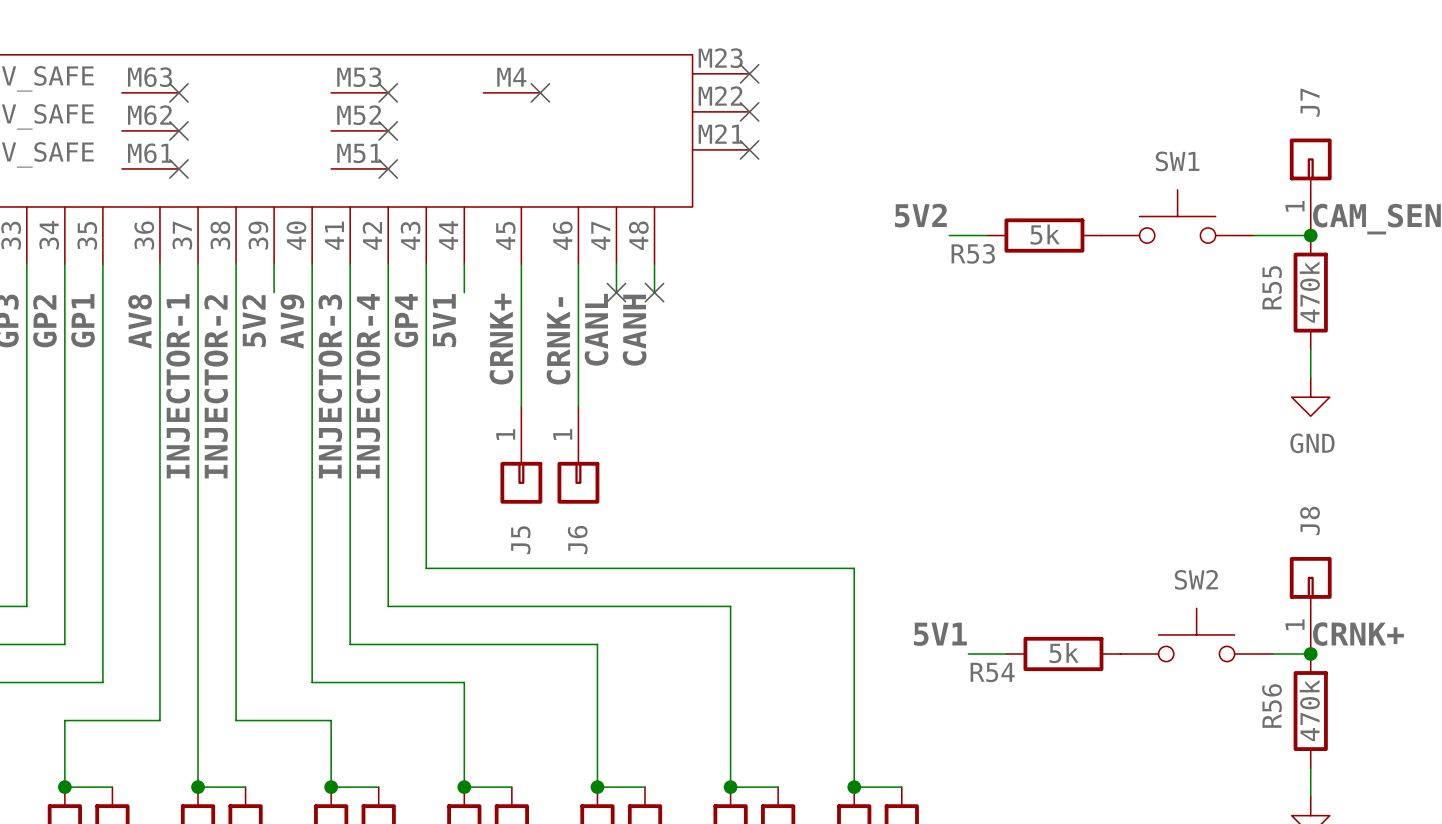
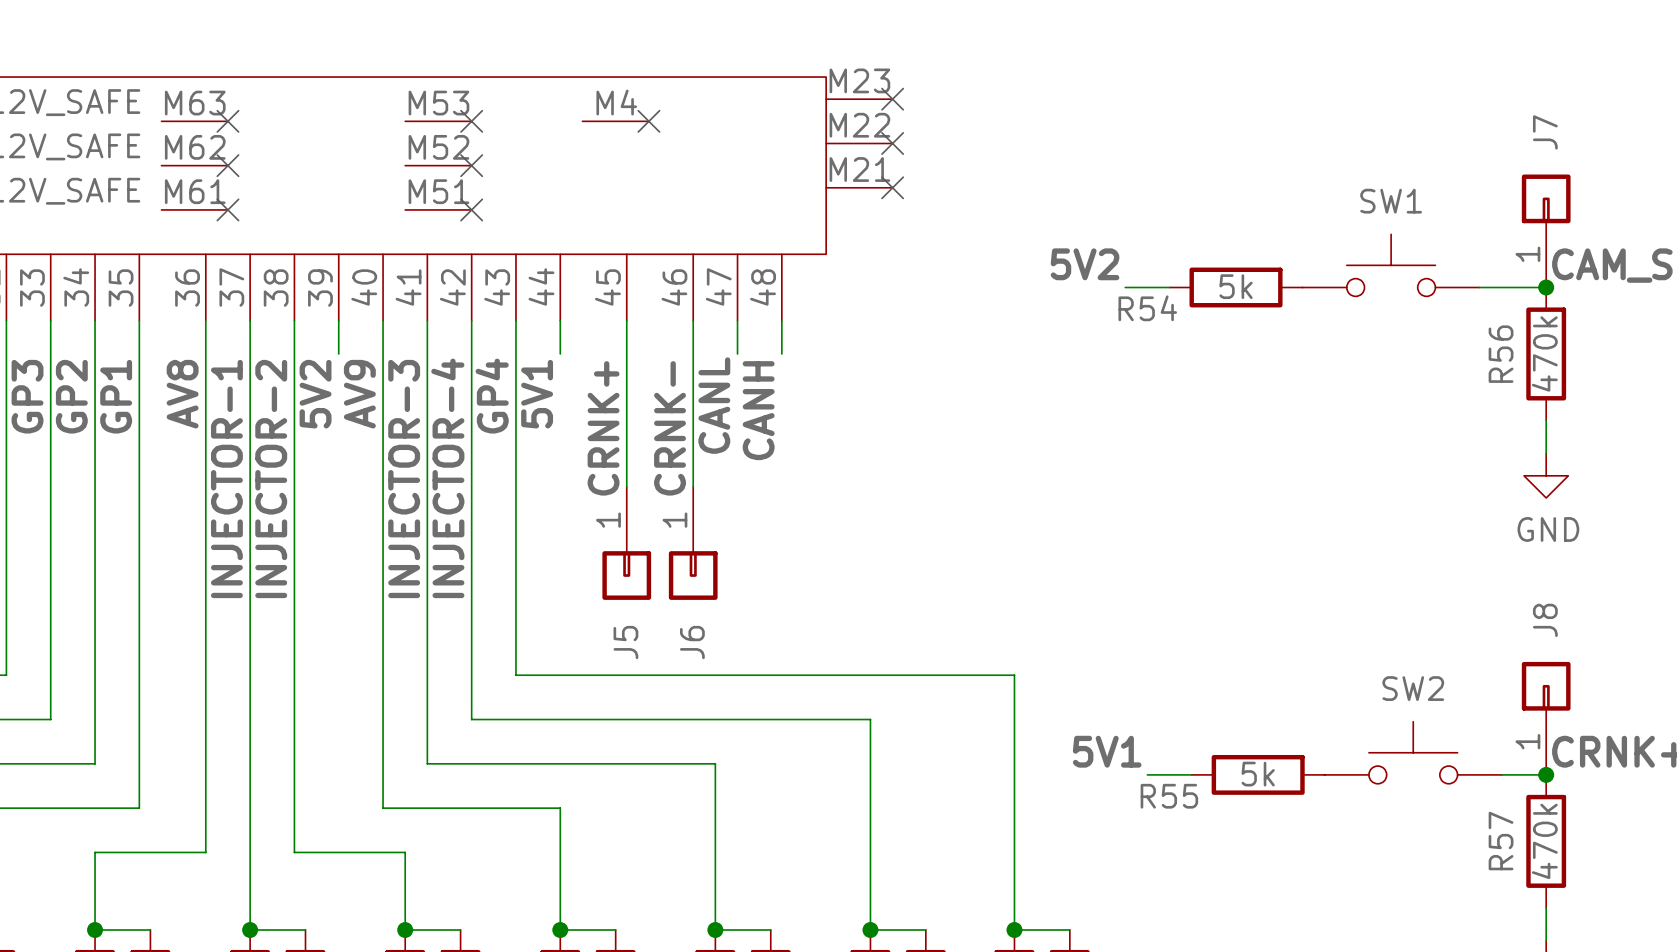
R53 name: R53 (973, 253) -> R54 (1147, 308)
R55 name: R55 (1272, 287) -> R56 (1501, 354)
no-connect mark: (616, 292) -> none
no-connect mark: (654, 292) -> none
R54 name: R54 (992, 672) -> R55 (1169, 796)
R56 name: R56 (1271, 706) -> R57 (1501, 841)

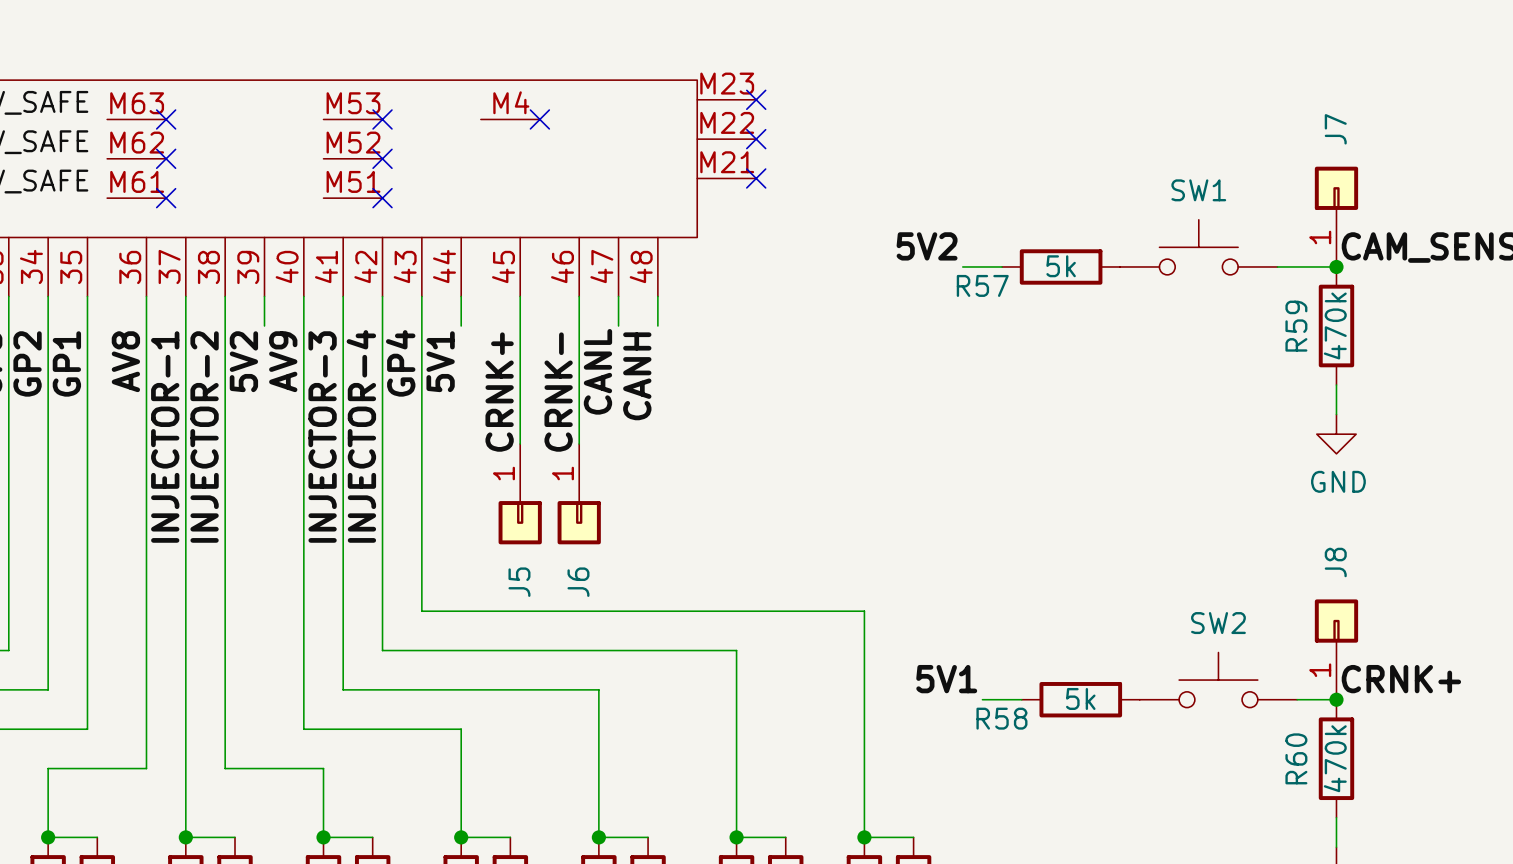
R54 name: R54 (1147, 308) -> R57 (982, 285)
R56 name: R56 (1501, 354) -> R59 (1296, 326)
R55 name: R55 (1169, 796) -> R58 (1001, 718)
R57 name: R57 (1501, 841) -> R60 (1296, 758)

